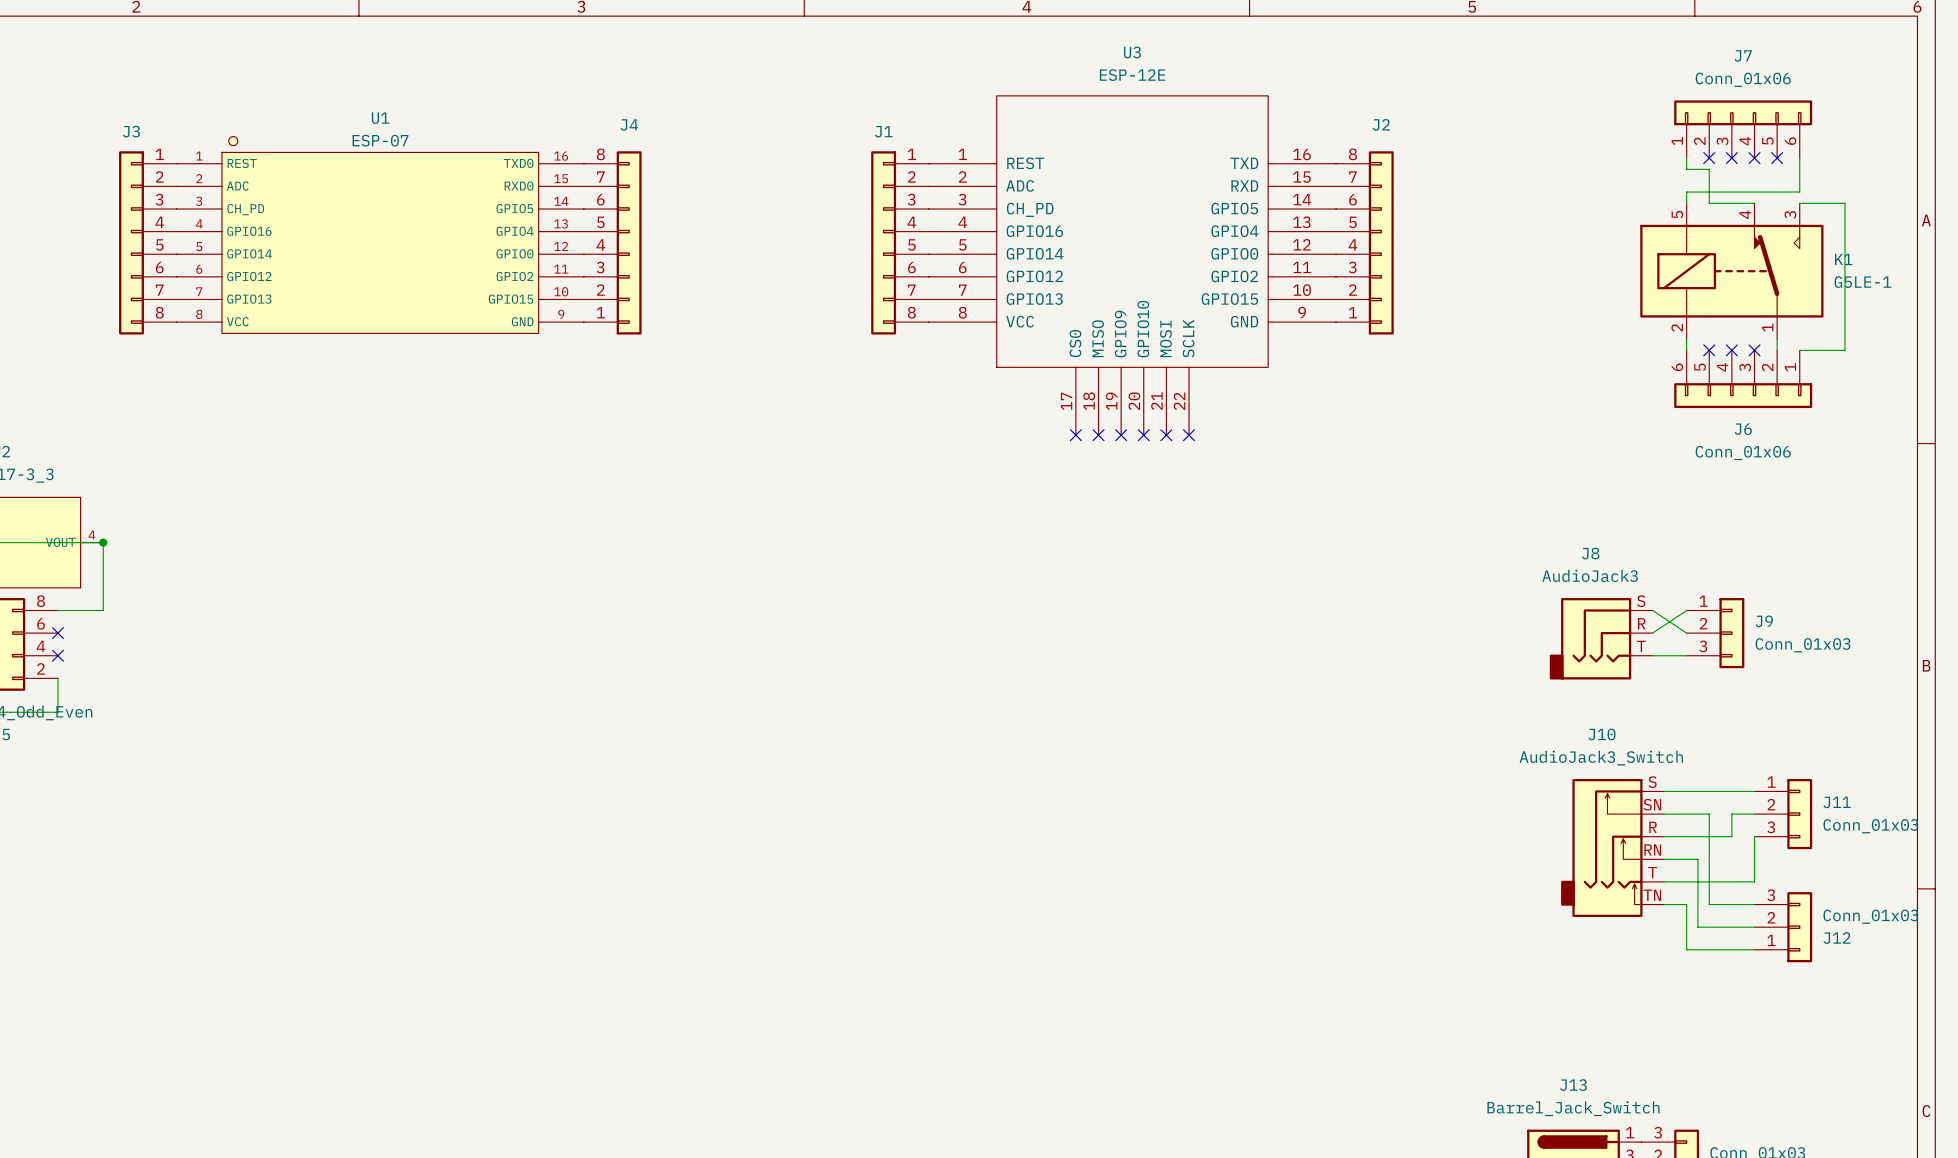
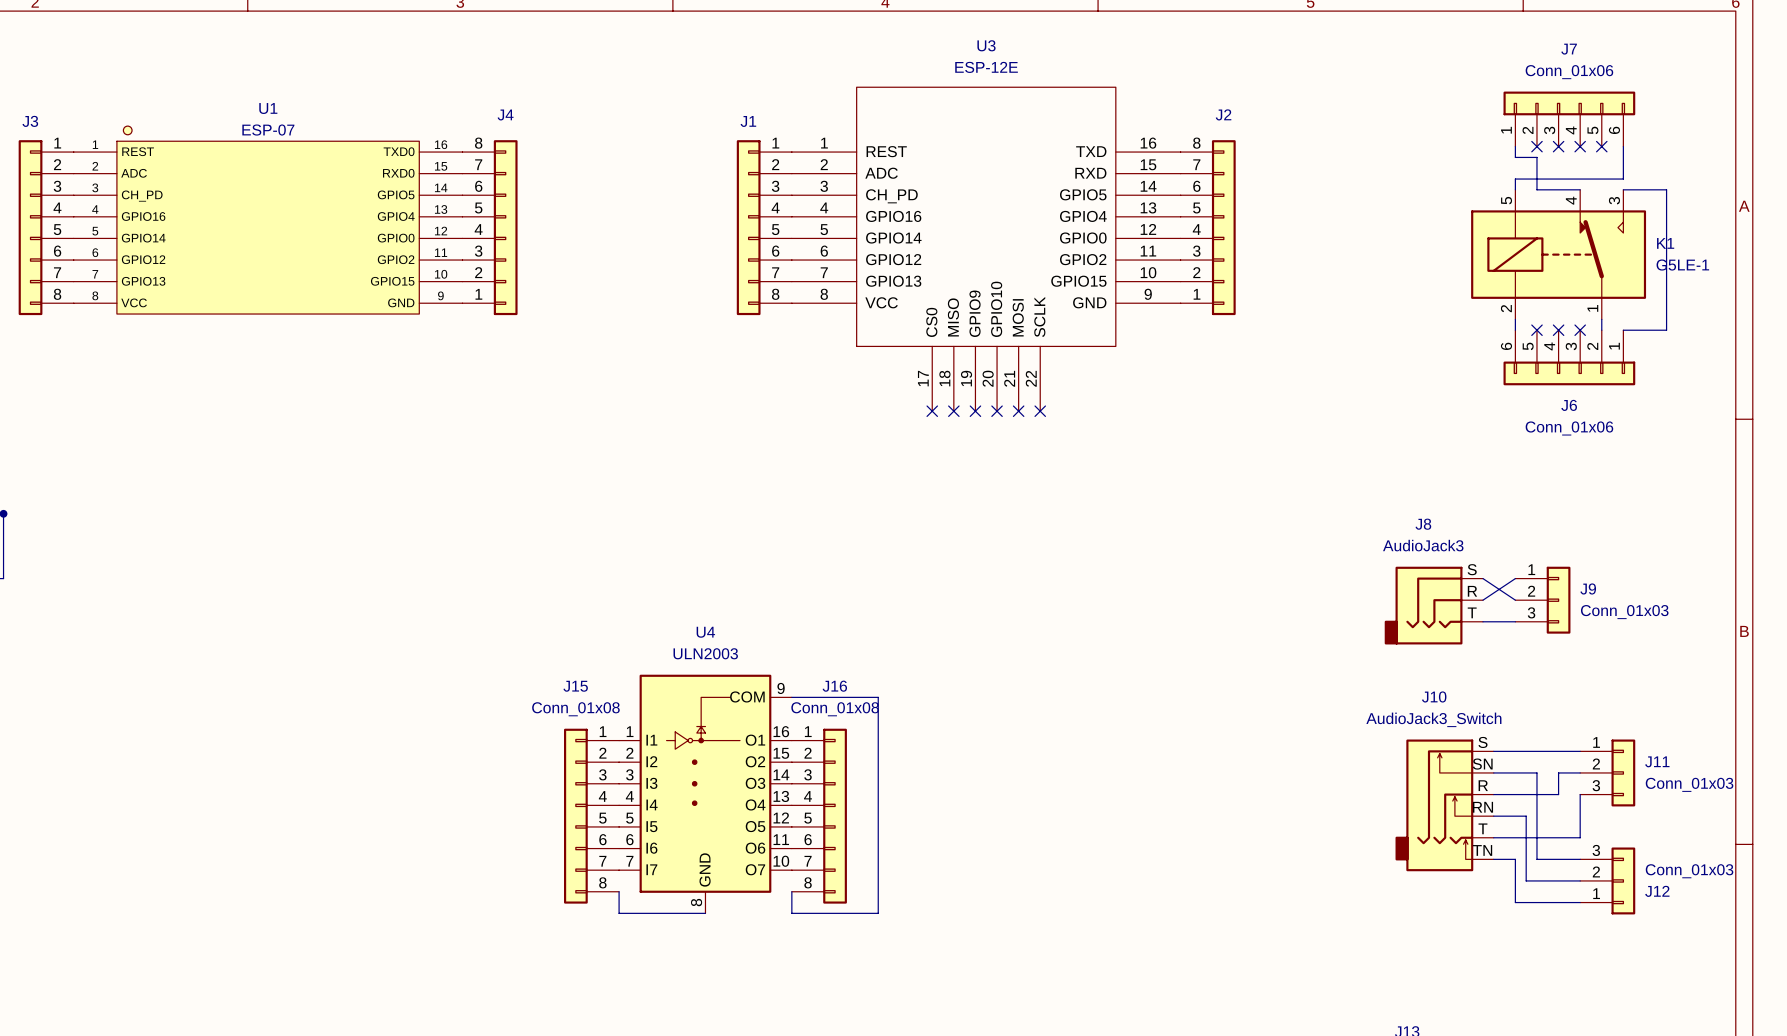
wire: none -> (791, 697) (878, 697) (878, 913) (791, 913) (791, 891)
U4: none -> ULN2003 (705, 794)
J15: none -> Conn_01x08 (591, 816)
J16: none -> Conn_01x08 (819, 816)
wire: none -> (619, 891) (619, 913) (705, 913)

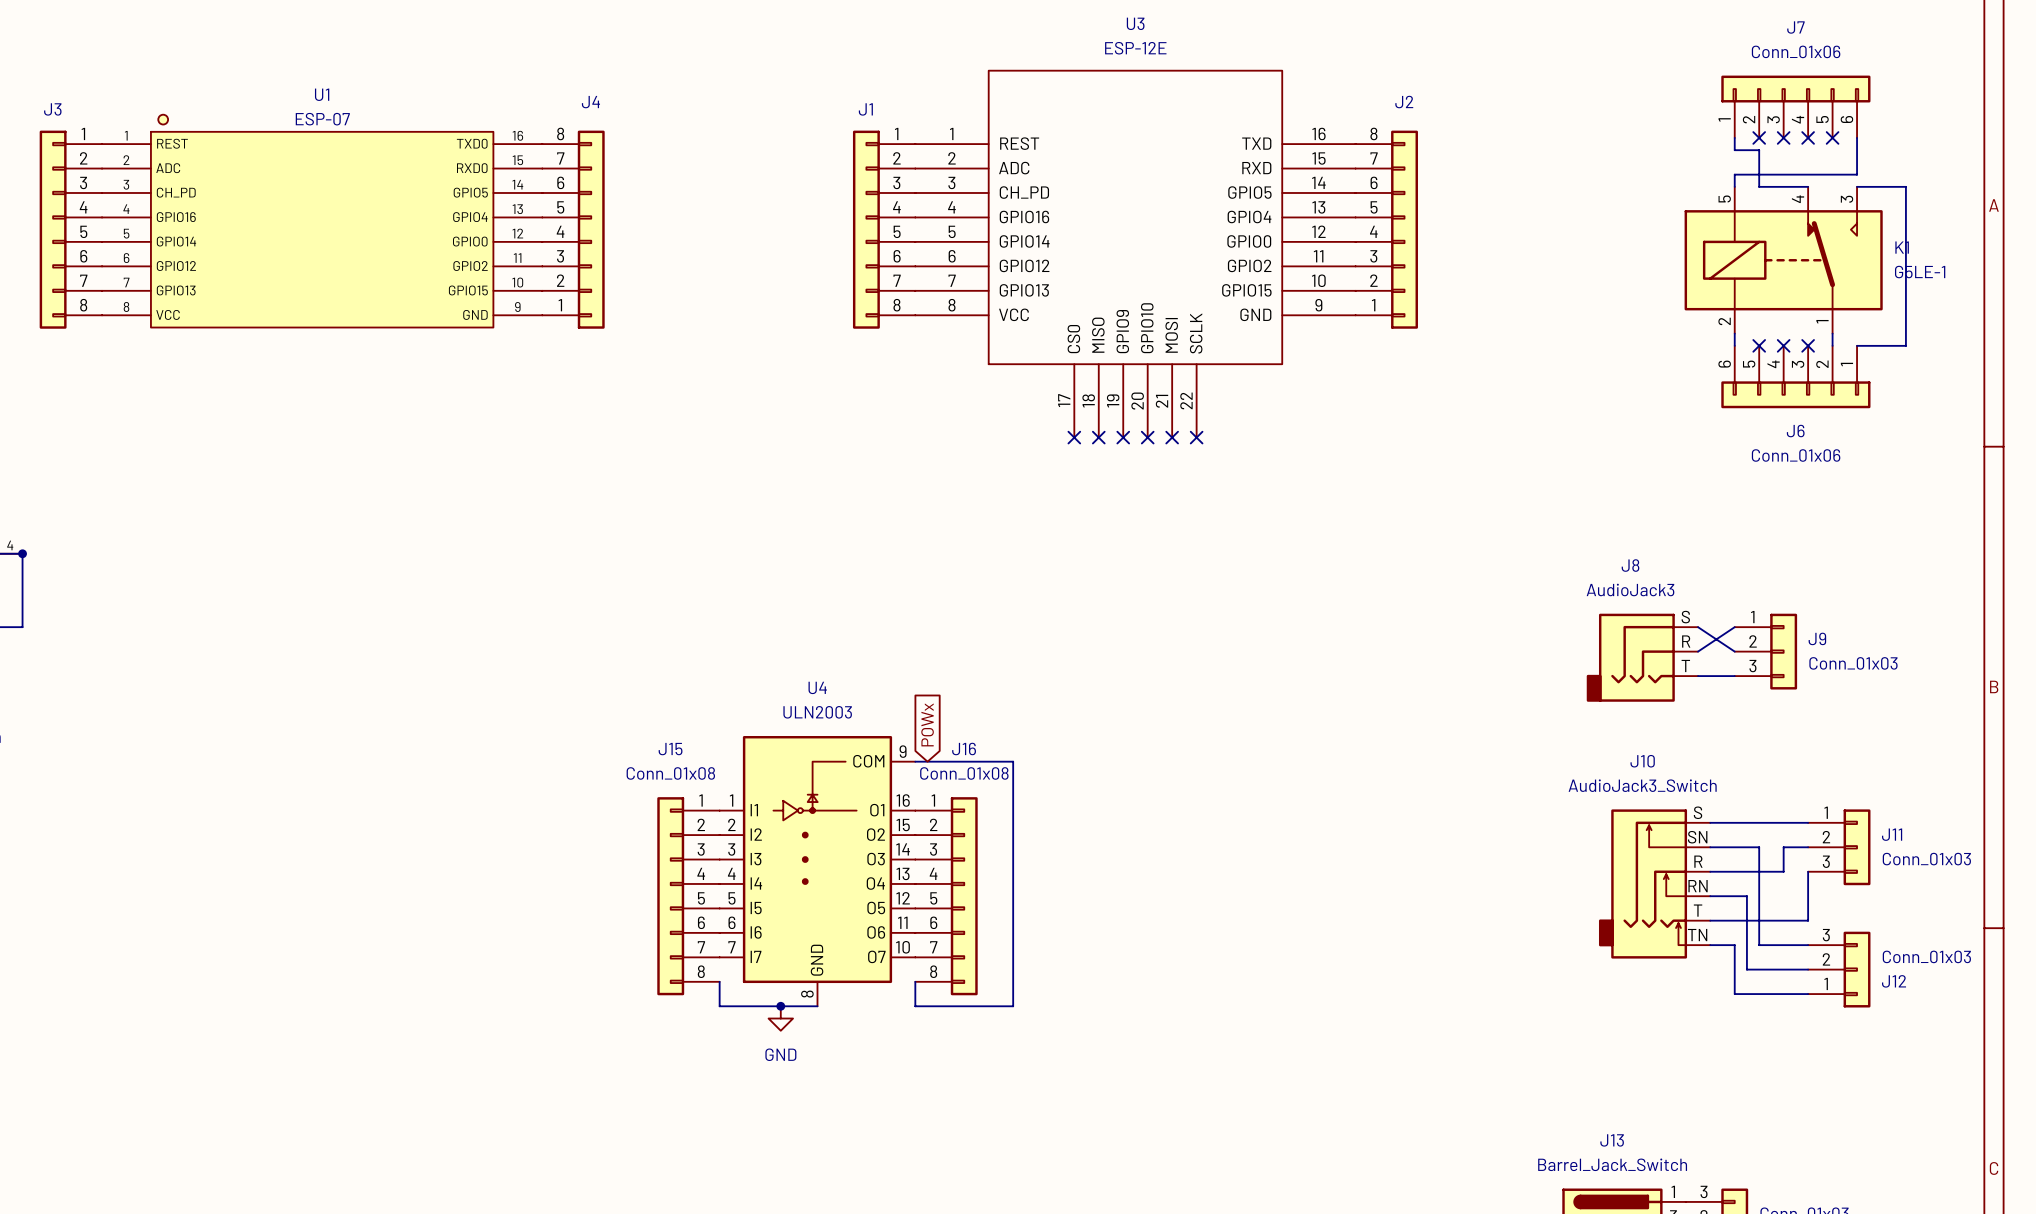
global label: none -> POWx (927, 724)
junction: none -> (780, 1006)
power symbol: none -> GND (780, 1018)

